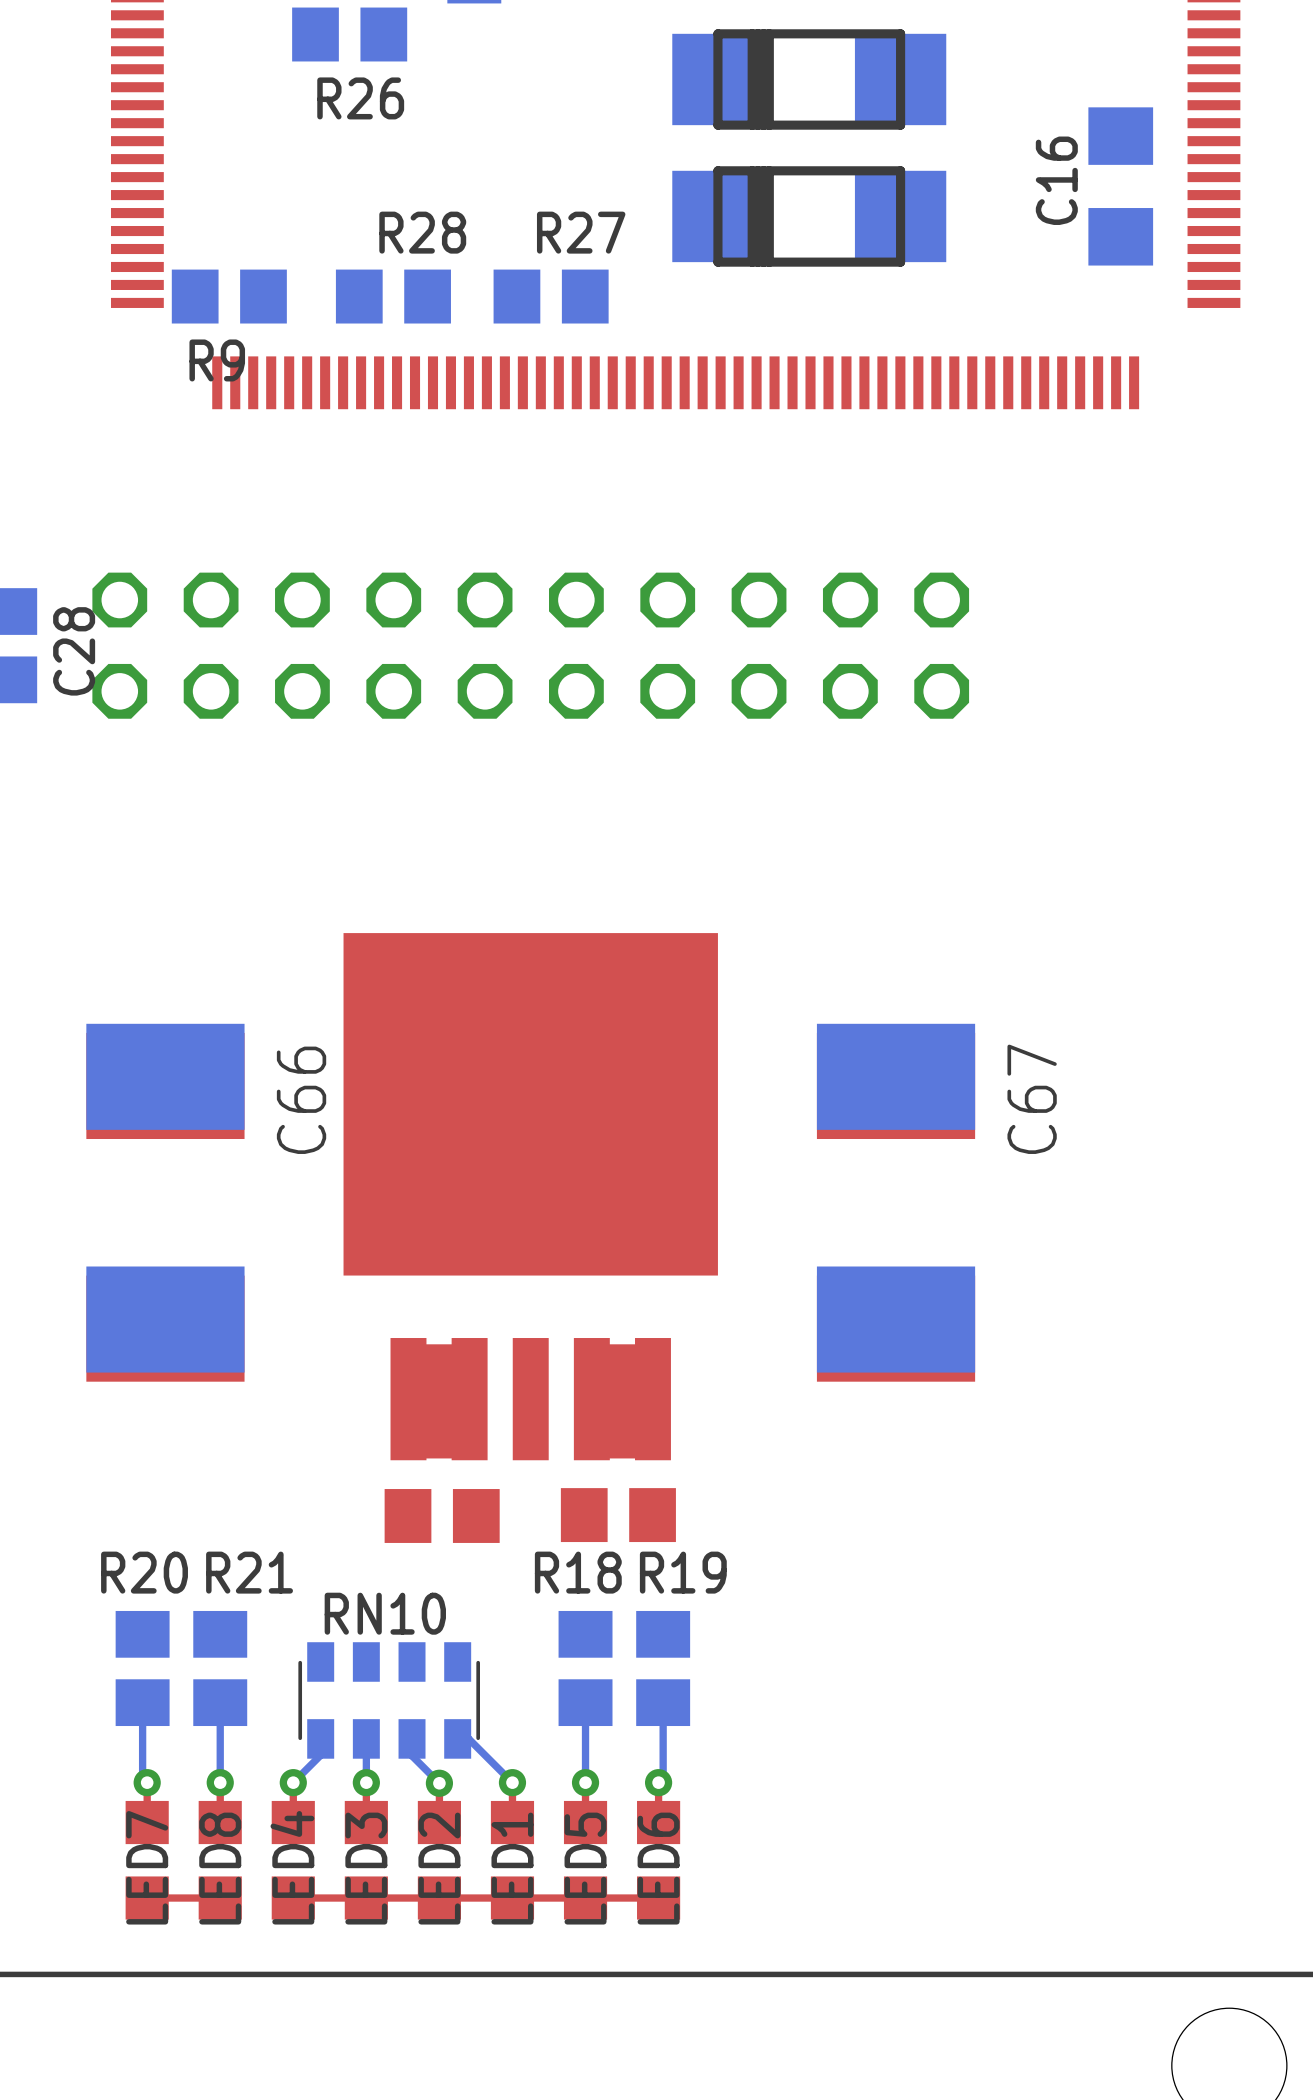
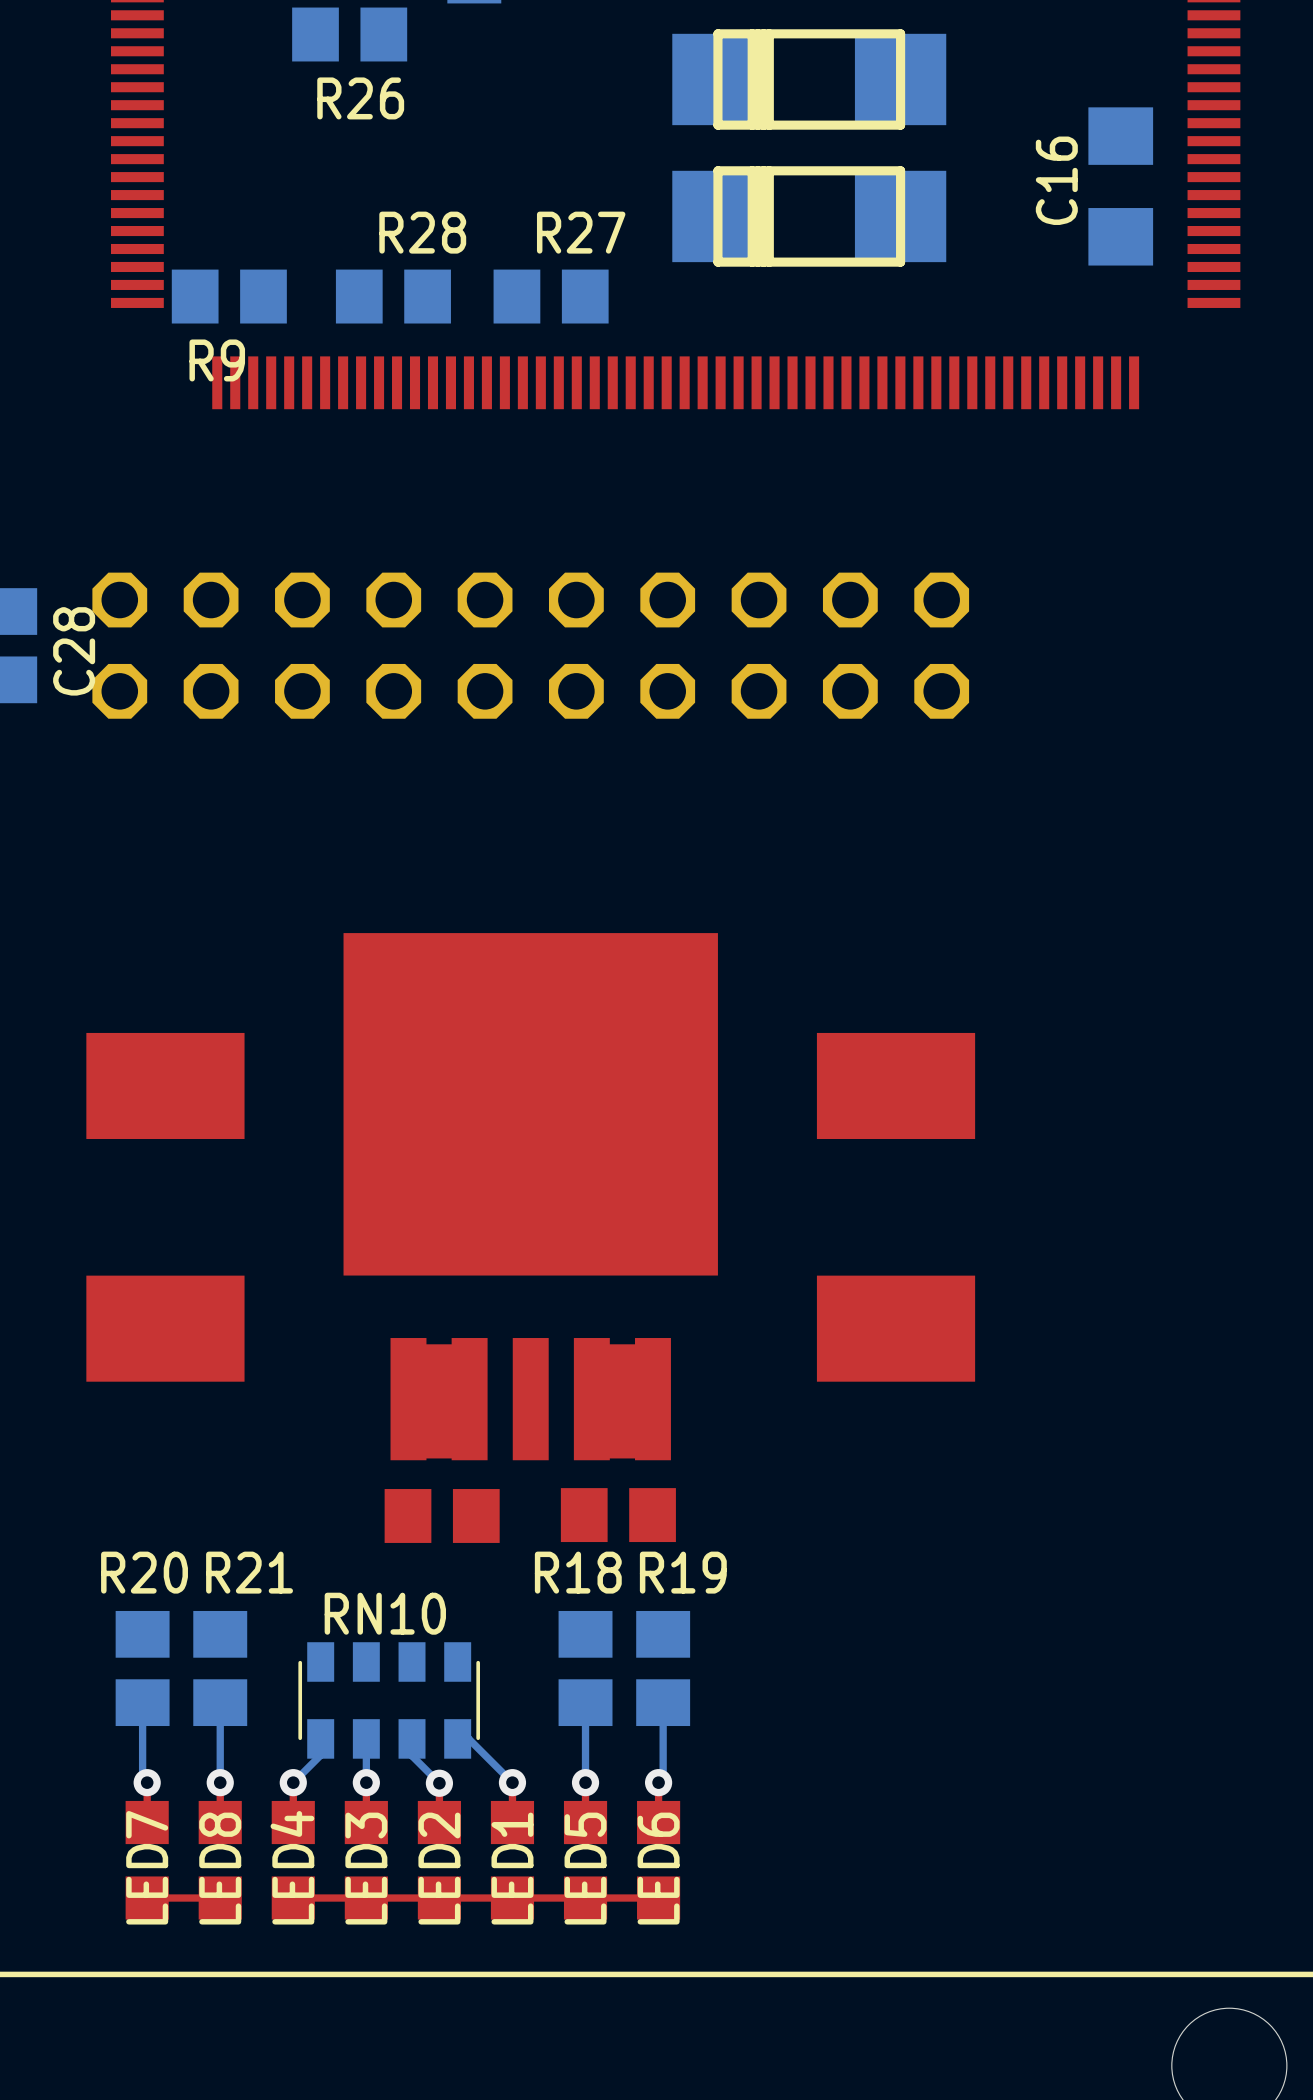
C66: (165, 1198) -> none
C67: (896, 1198) -> none

